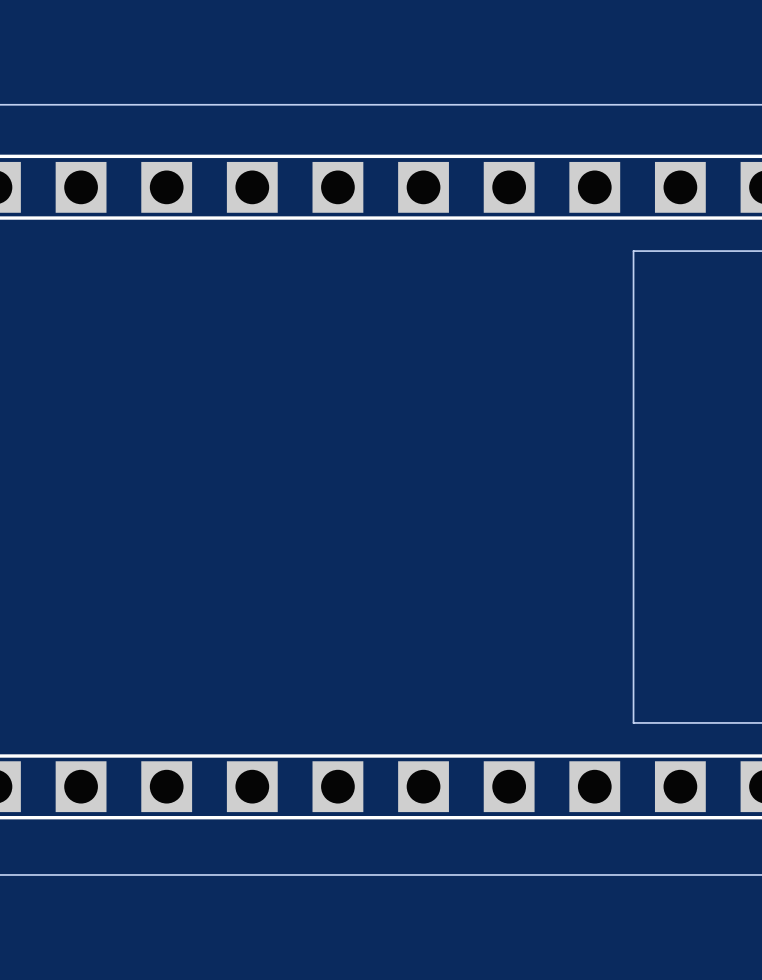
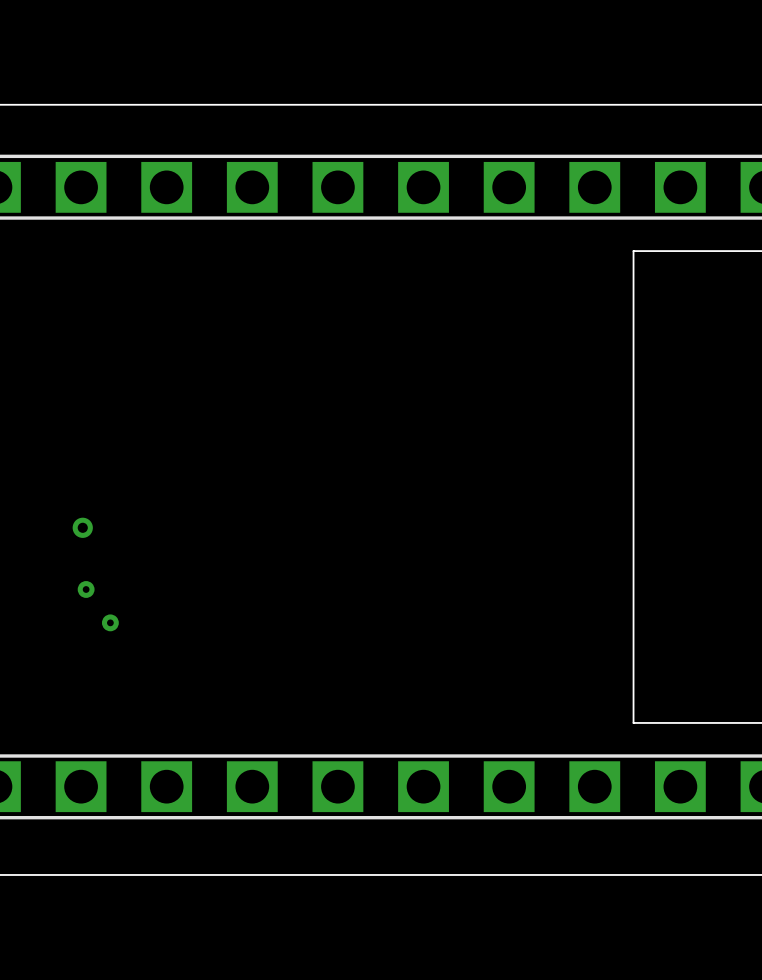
via: none -> (82, 527)
via: none -> (86, 589)
via: none -> (110, 622)

